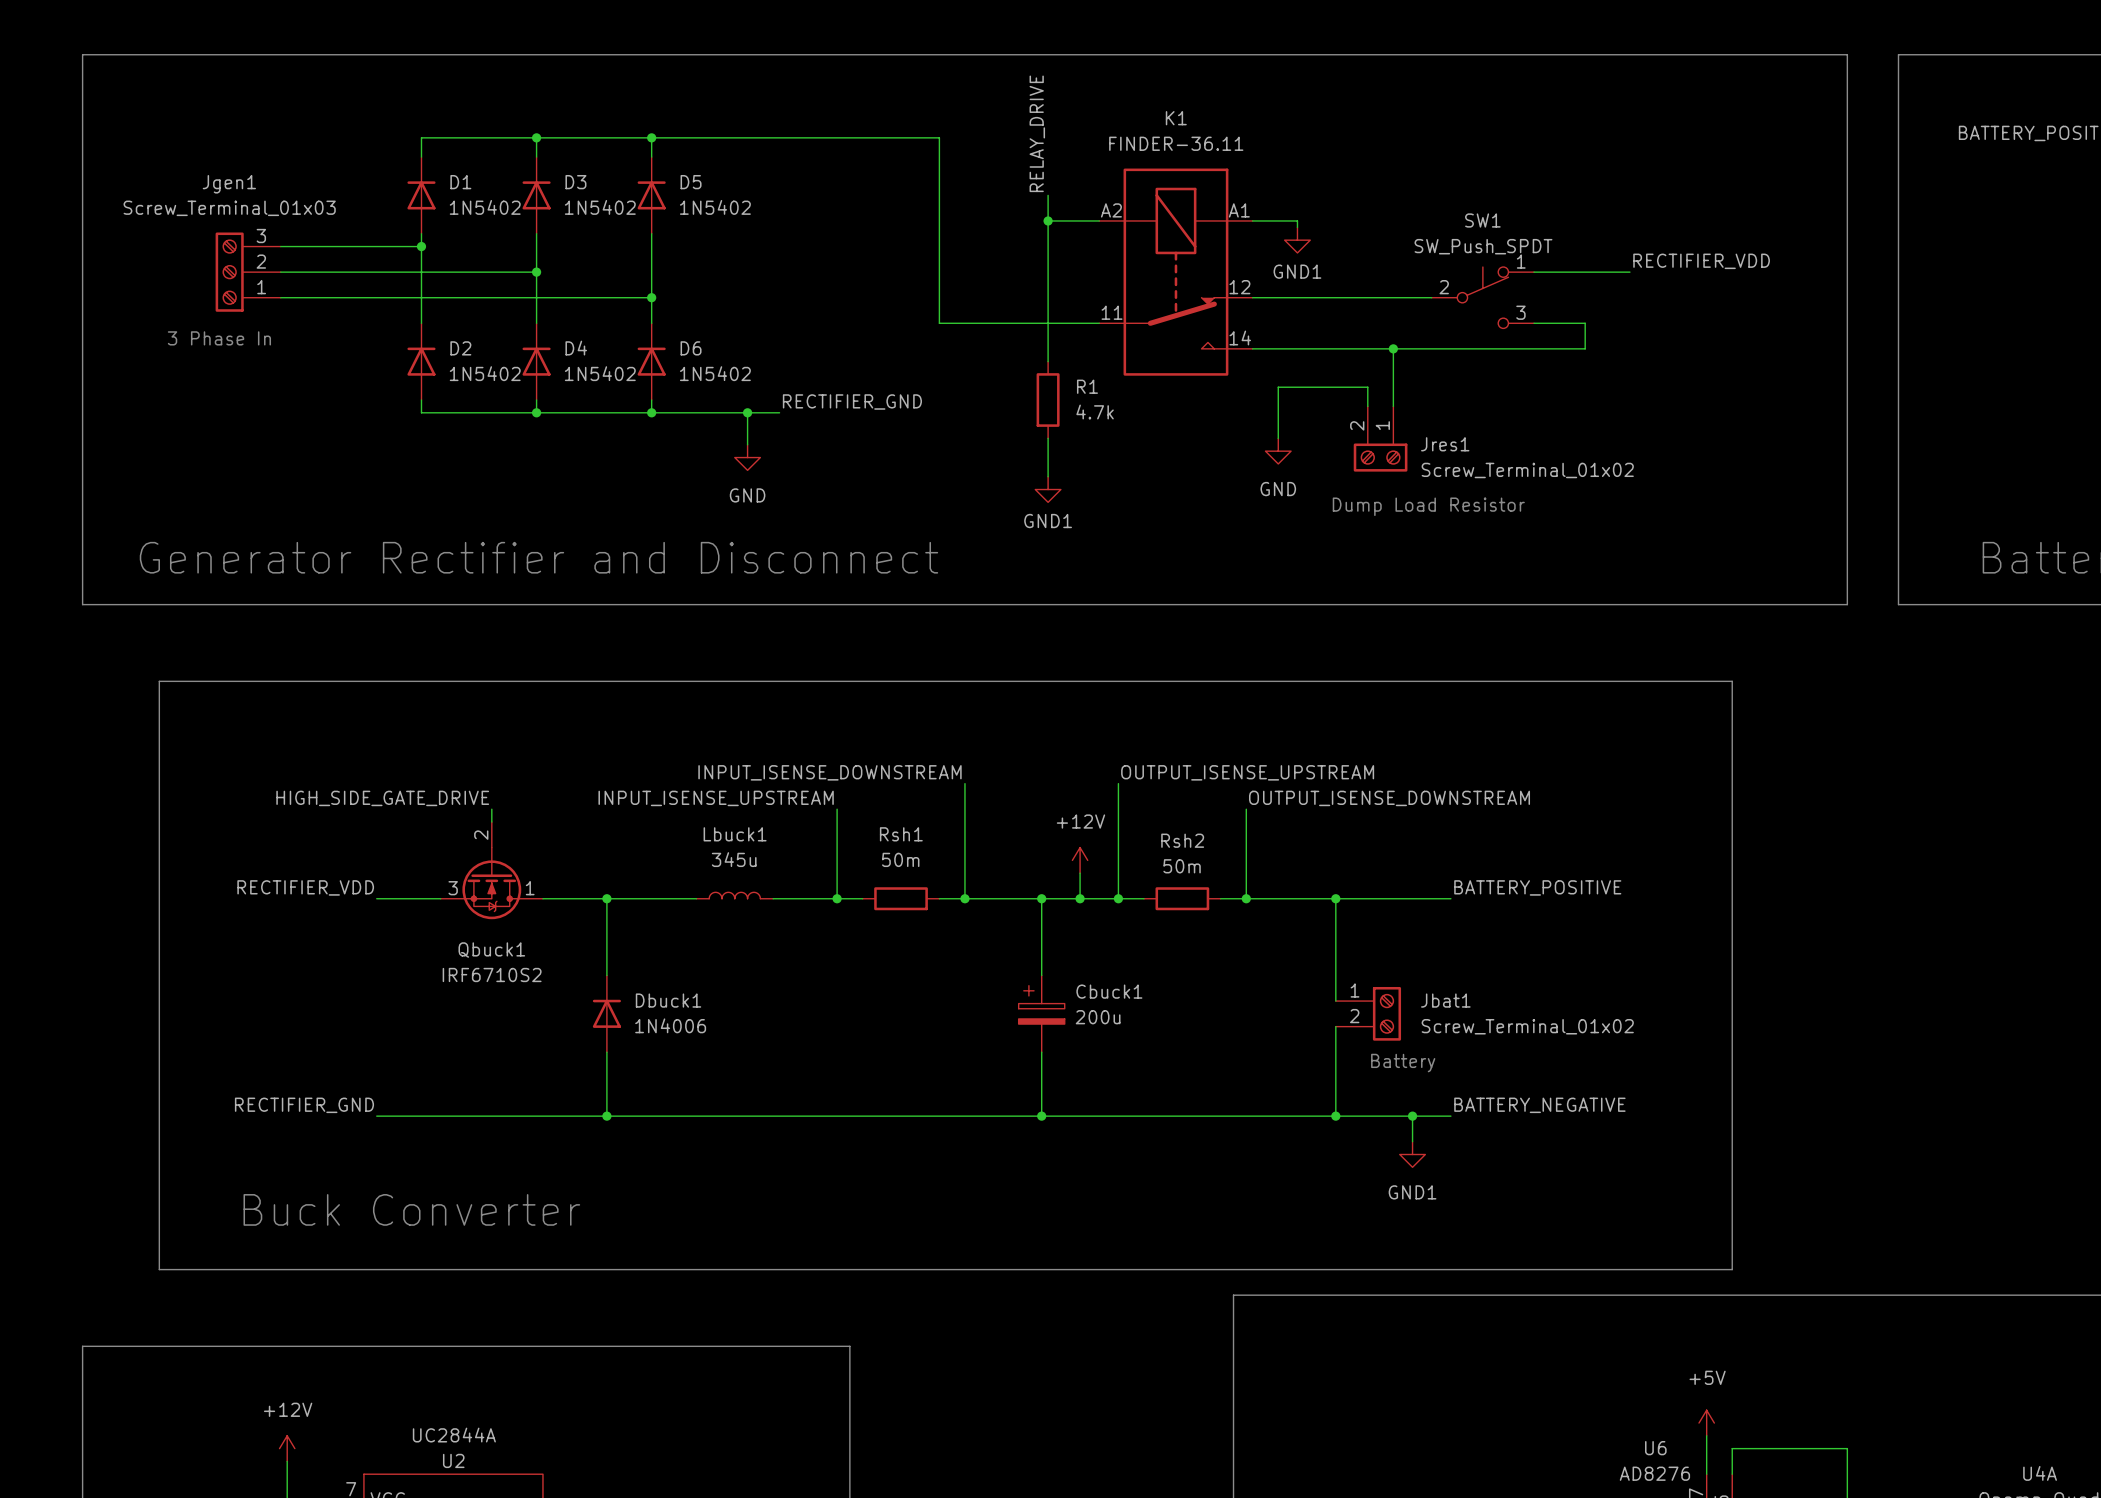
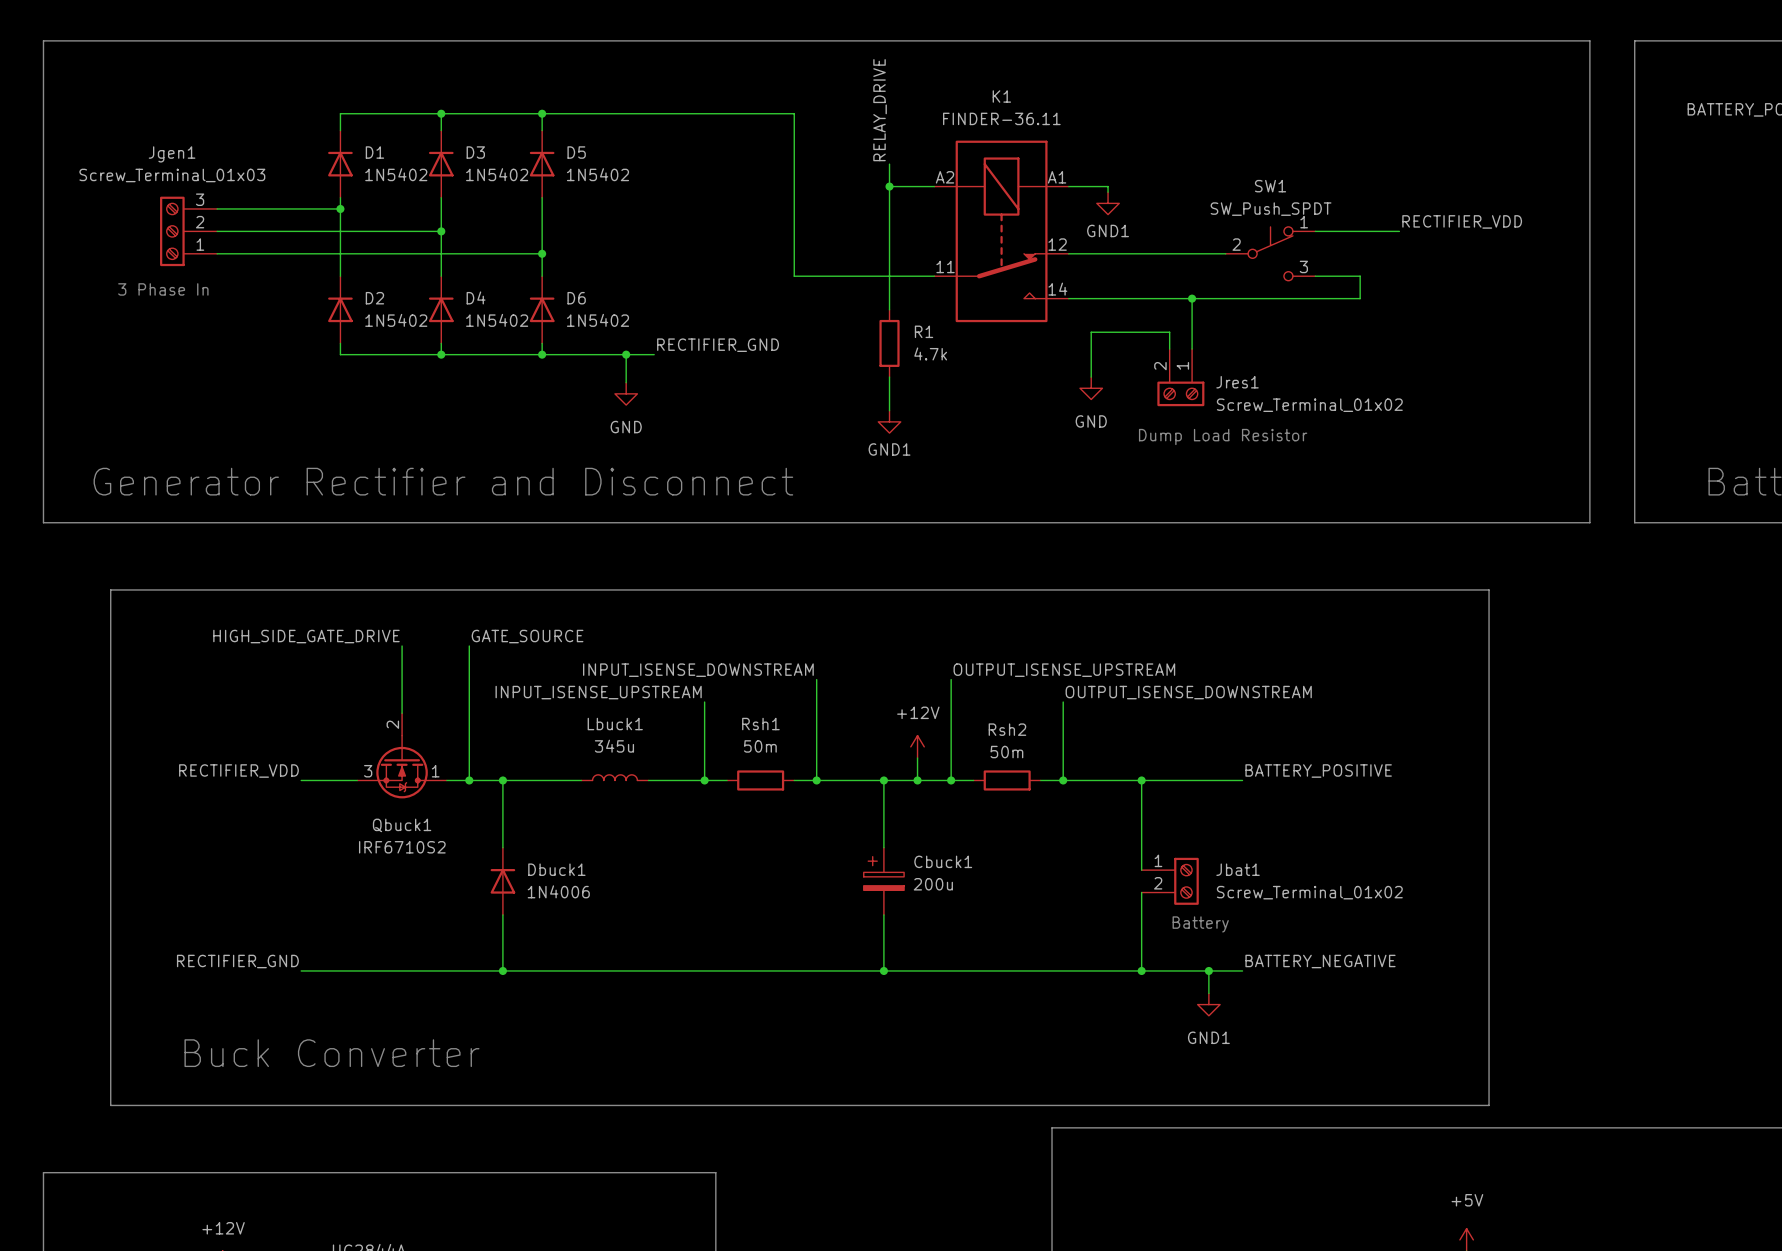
label: none -> GATE_SOURCE (527, 636)
wire: none -> (402, 646) (402, 702)
wire: none -> (469, 646) (469, 780)
label position: HIGH_SIDE_GATE_DRIVE (382, 798) -> HIGH_SIDE_GATE_DRIVE (306, 636)
junction: none -> (469, 780)

